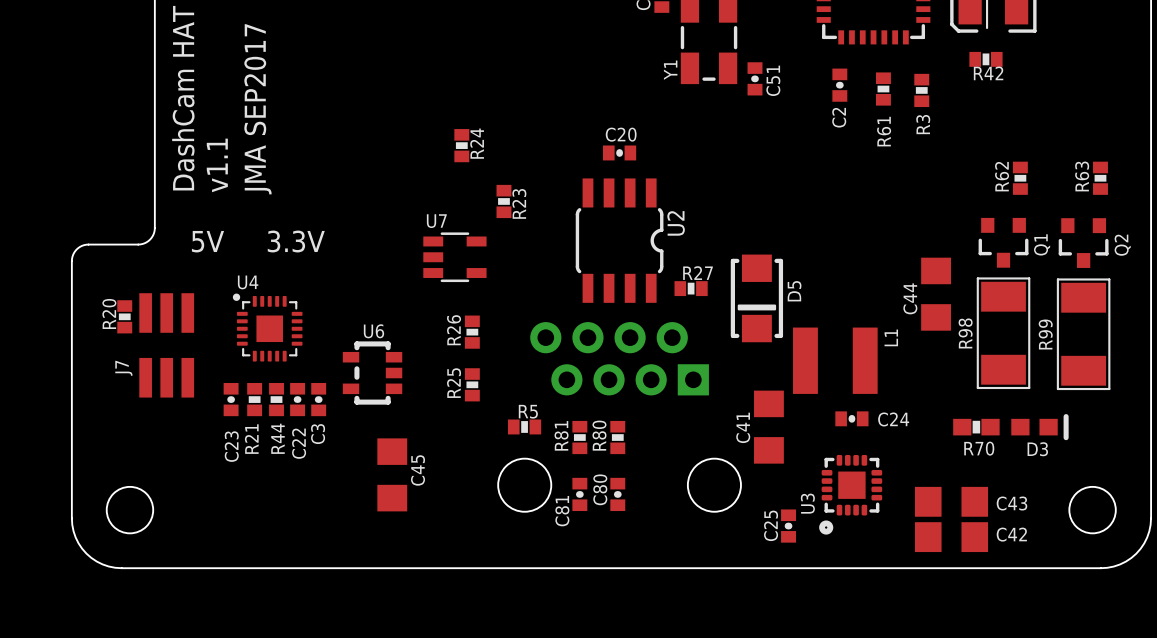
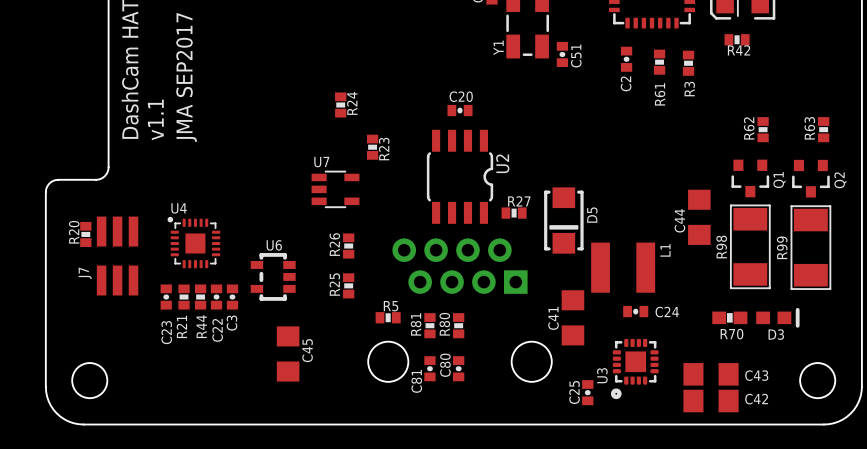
text: 5V (207, 241) -> none
text: 3.3V (296, 241) -> none

